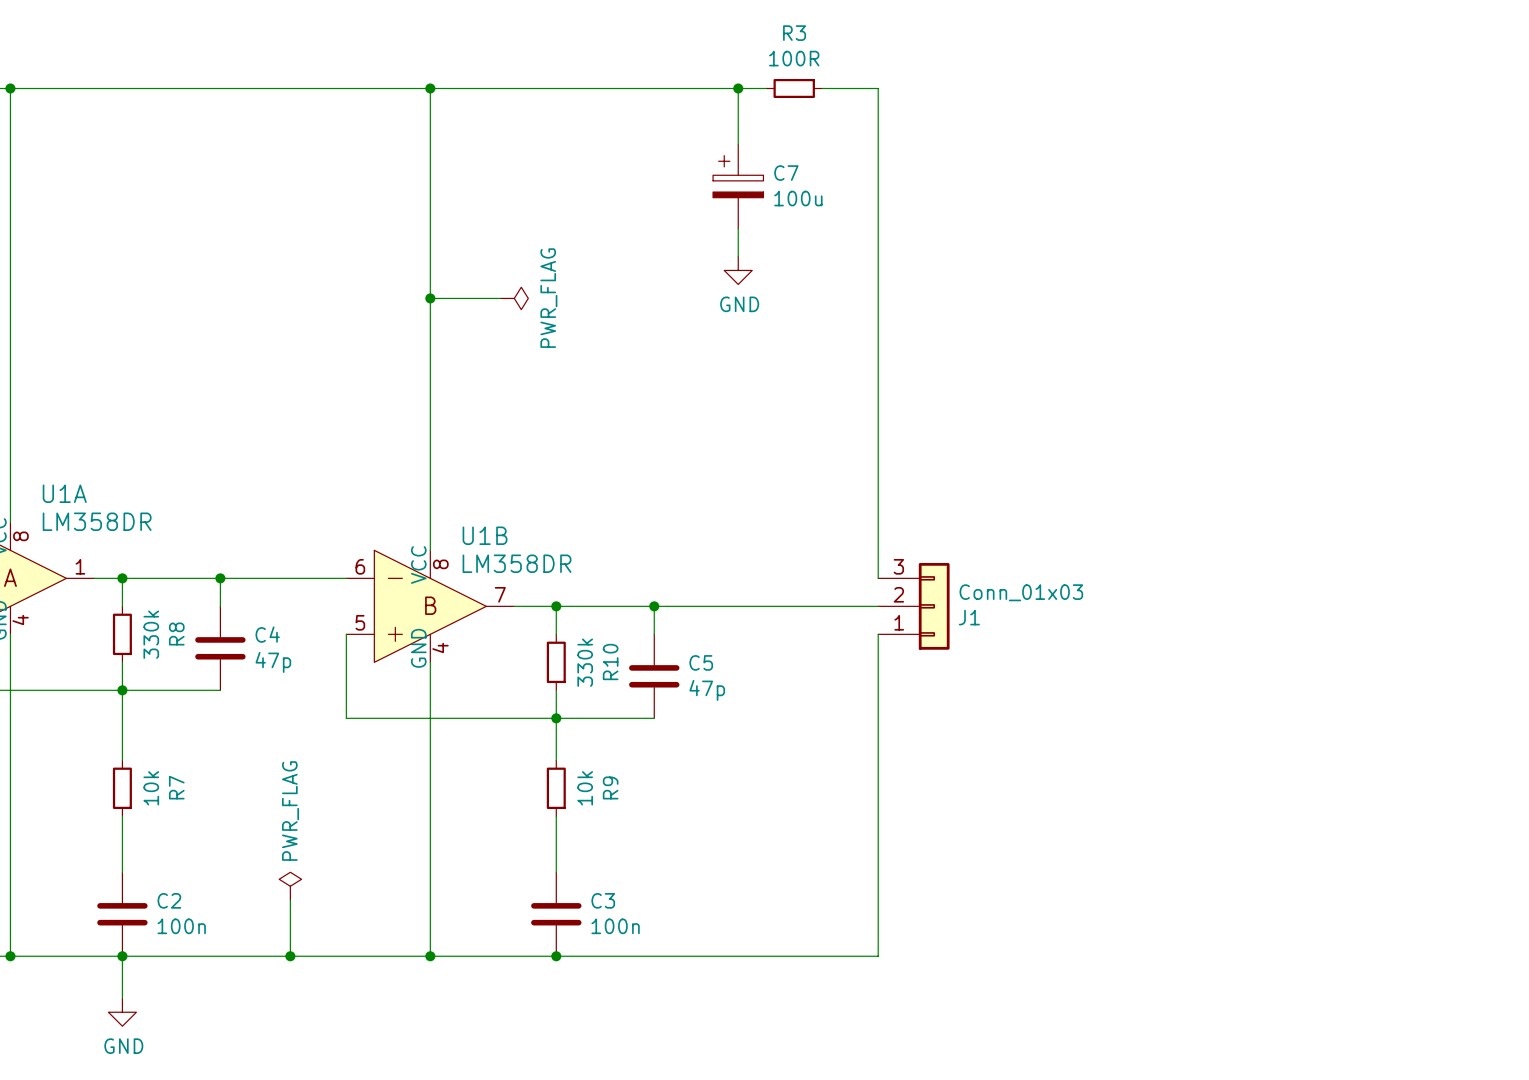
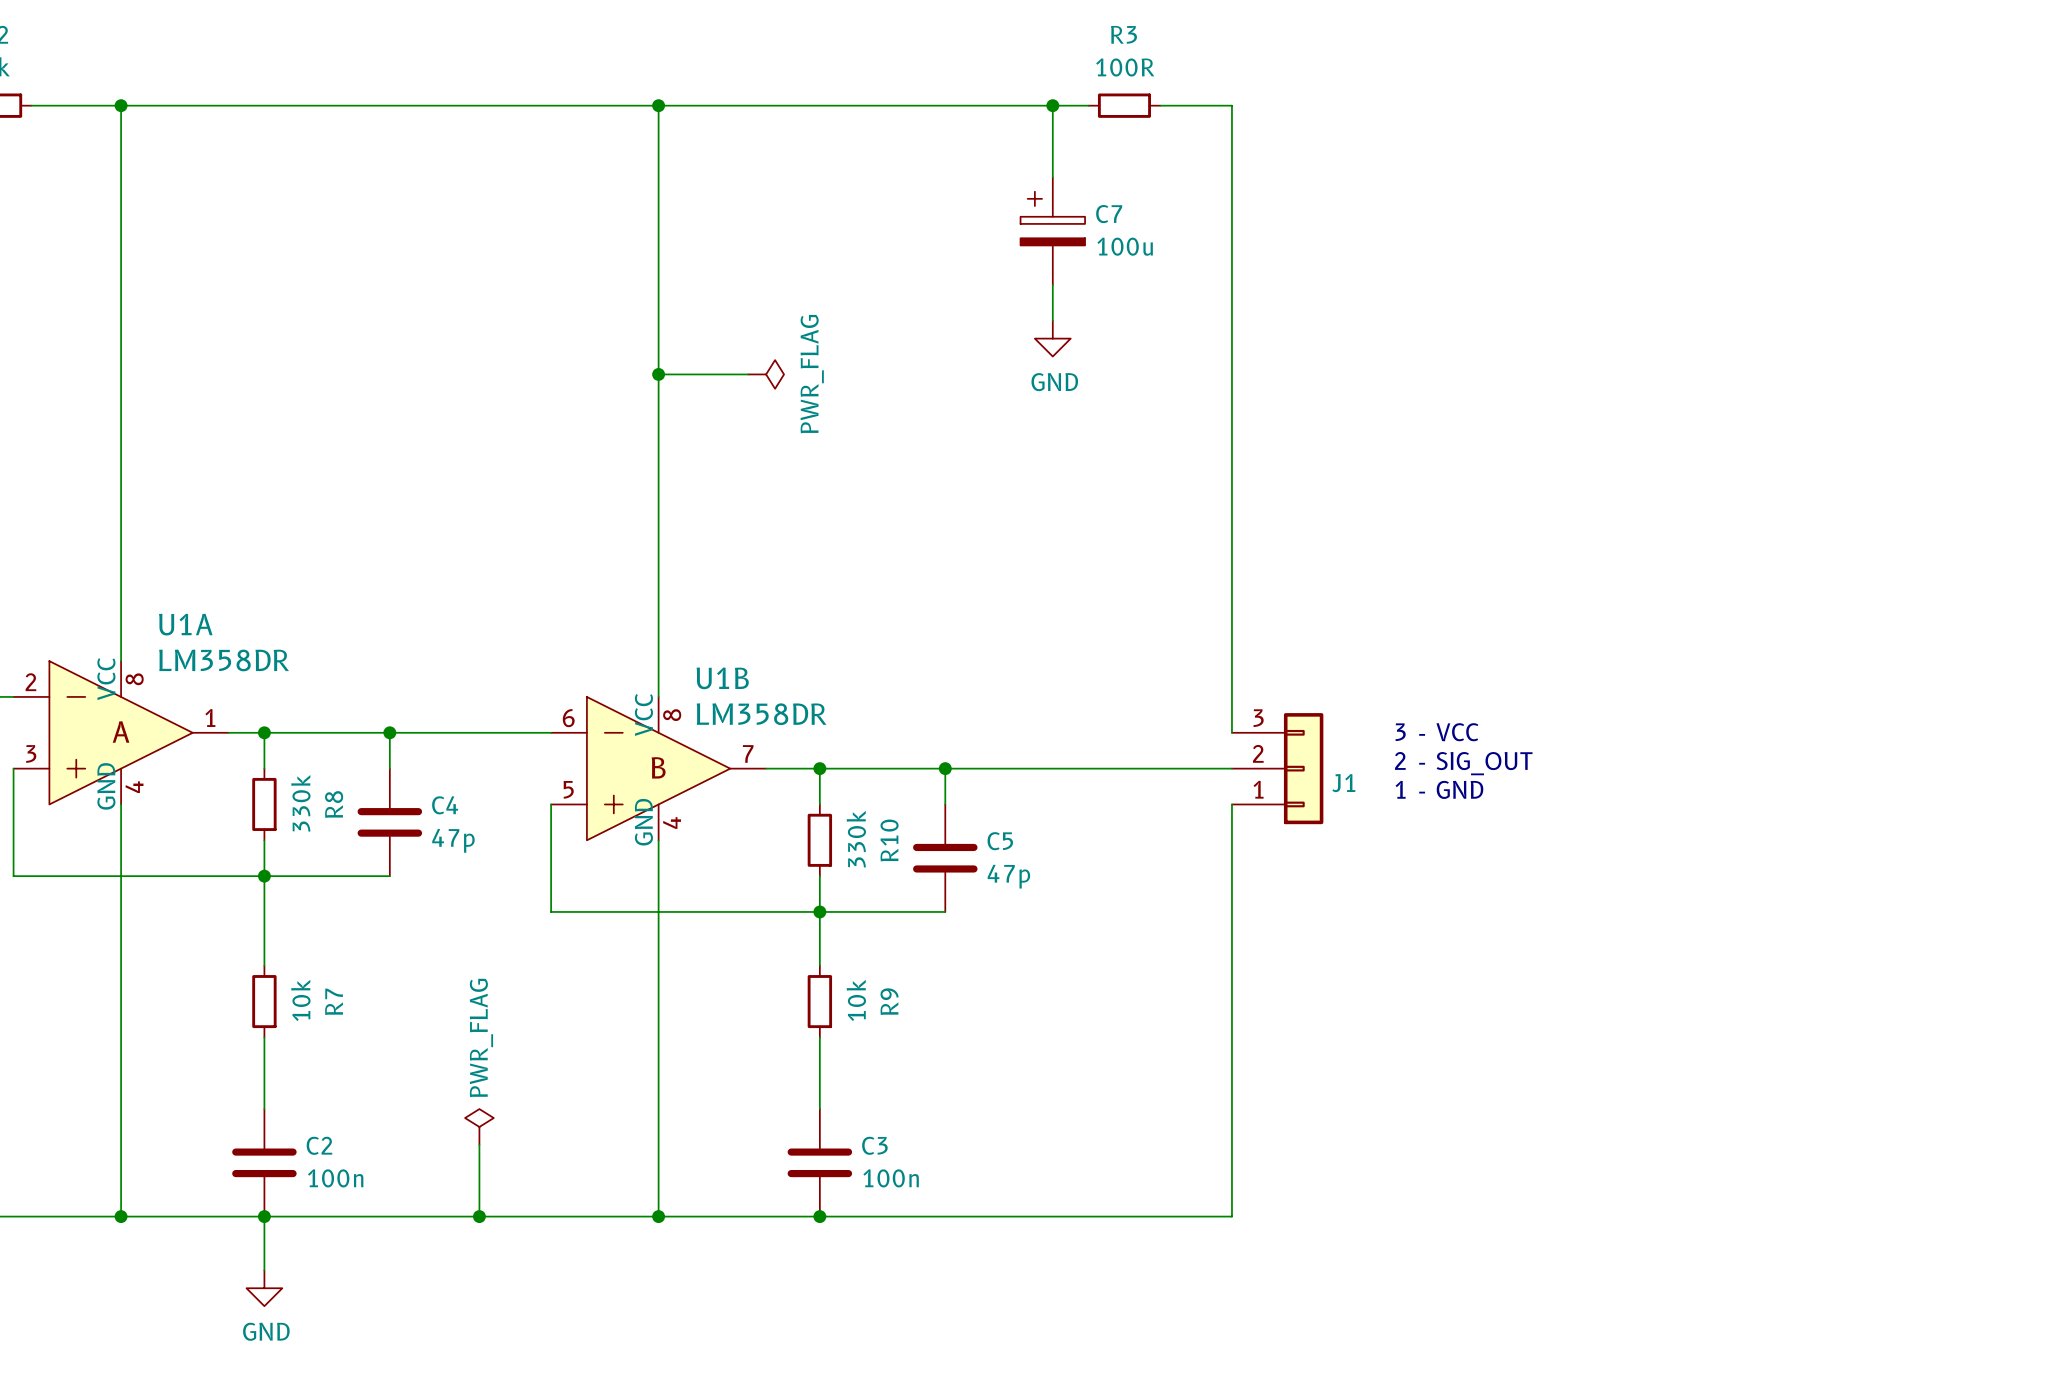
text: none -> 3 - VCC (1436, 732)
J1 value: Conn_01x03 (1021, 592) -> none
text: none -> 2 - SIG_OUT (1463, 763)
text: none -> 1 - GND (1439, 789)

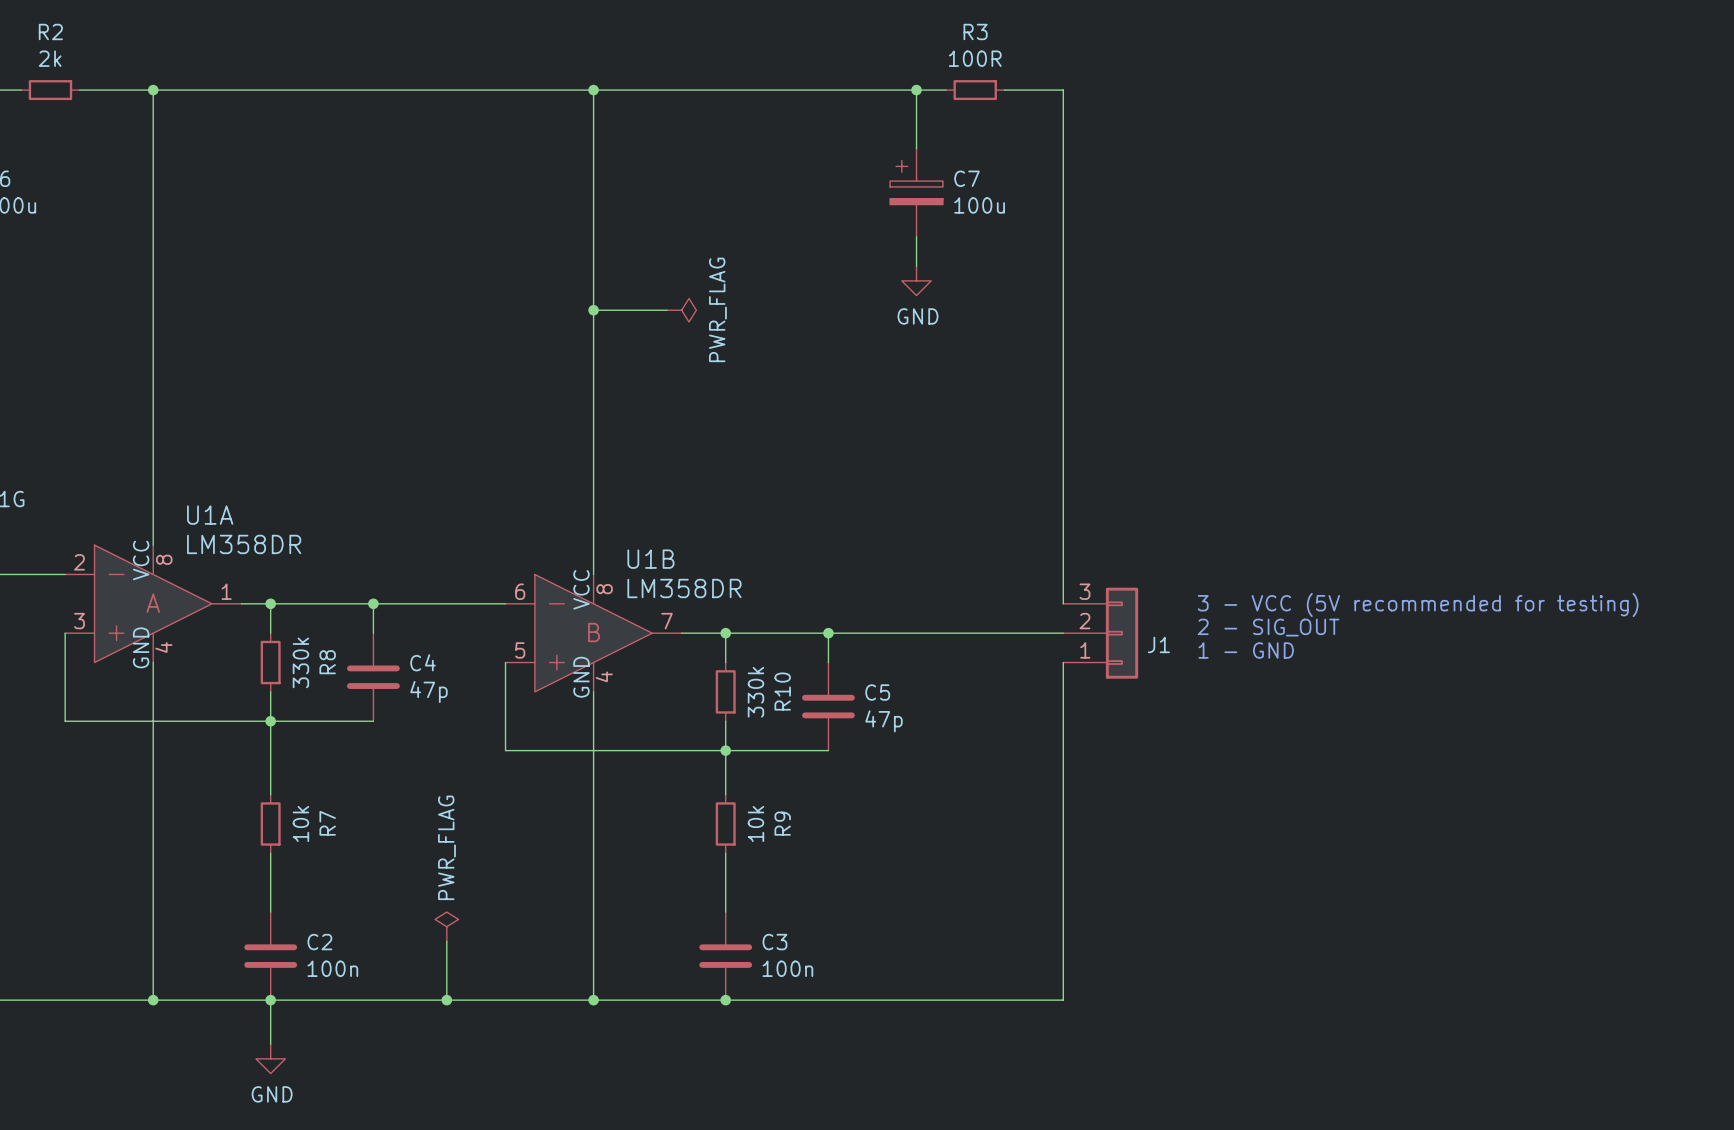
text: 3 - VCC (1436, 732) -> 3 - VCC (5V recommended for testing) (1418, 604)

